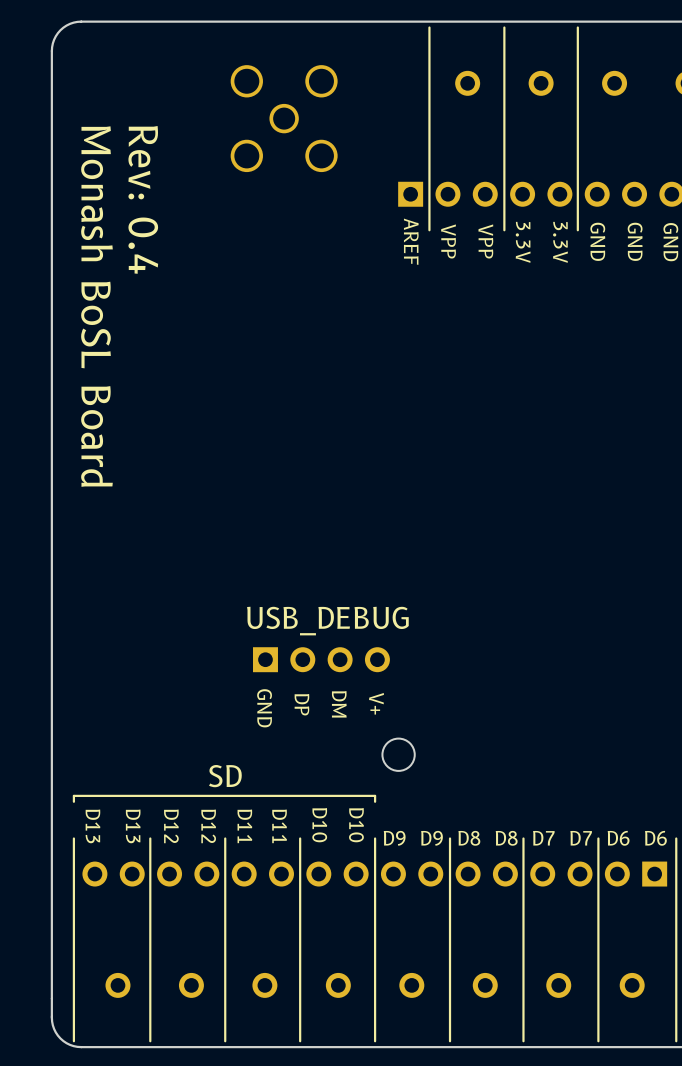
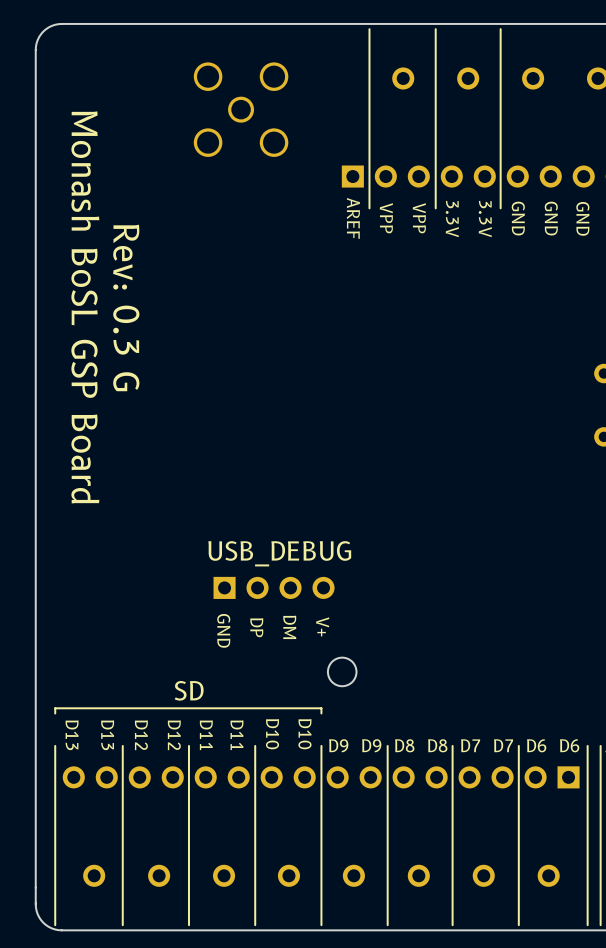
text: Rev: 0.4 (143, 199) -> Rev: 0.3 G (126, 307)
text: Monash BoSL Board (96, 306) -> Monash BoSL GSP Board (85, 307)

